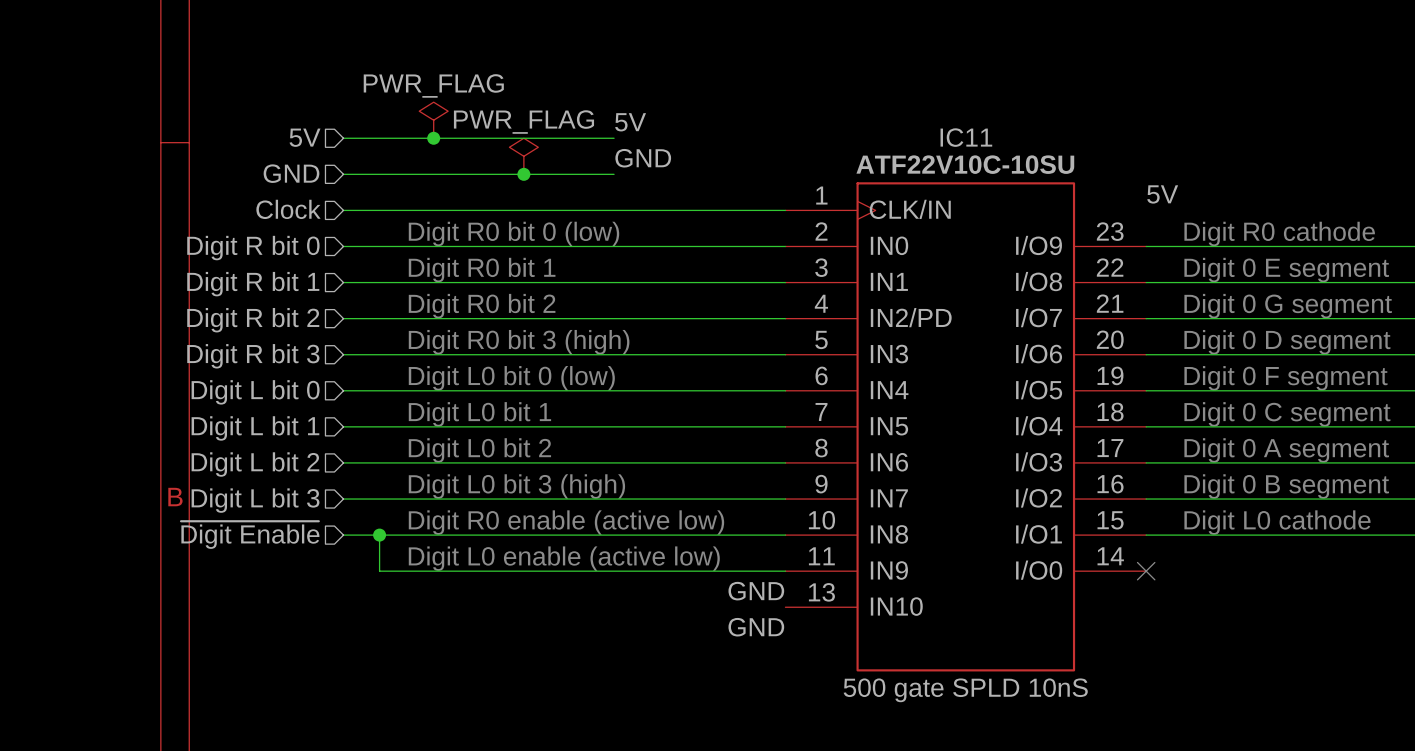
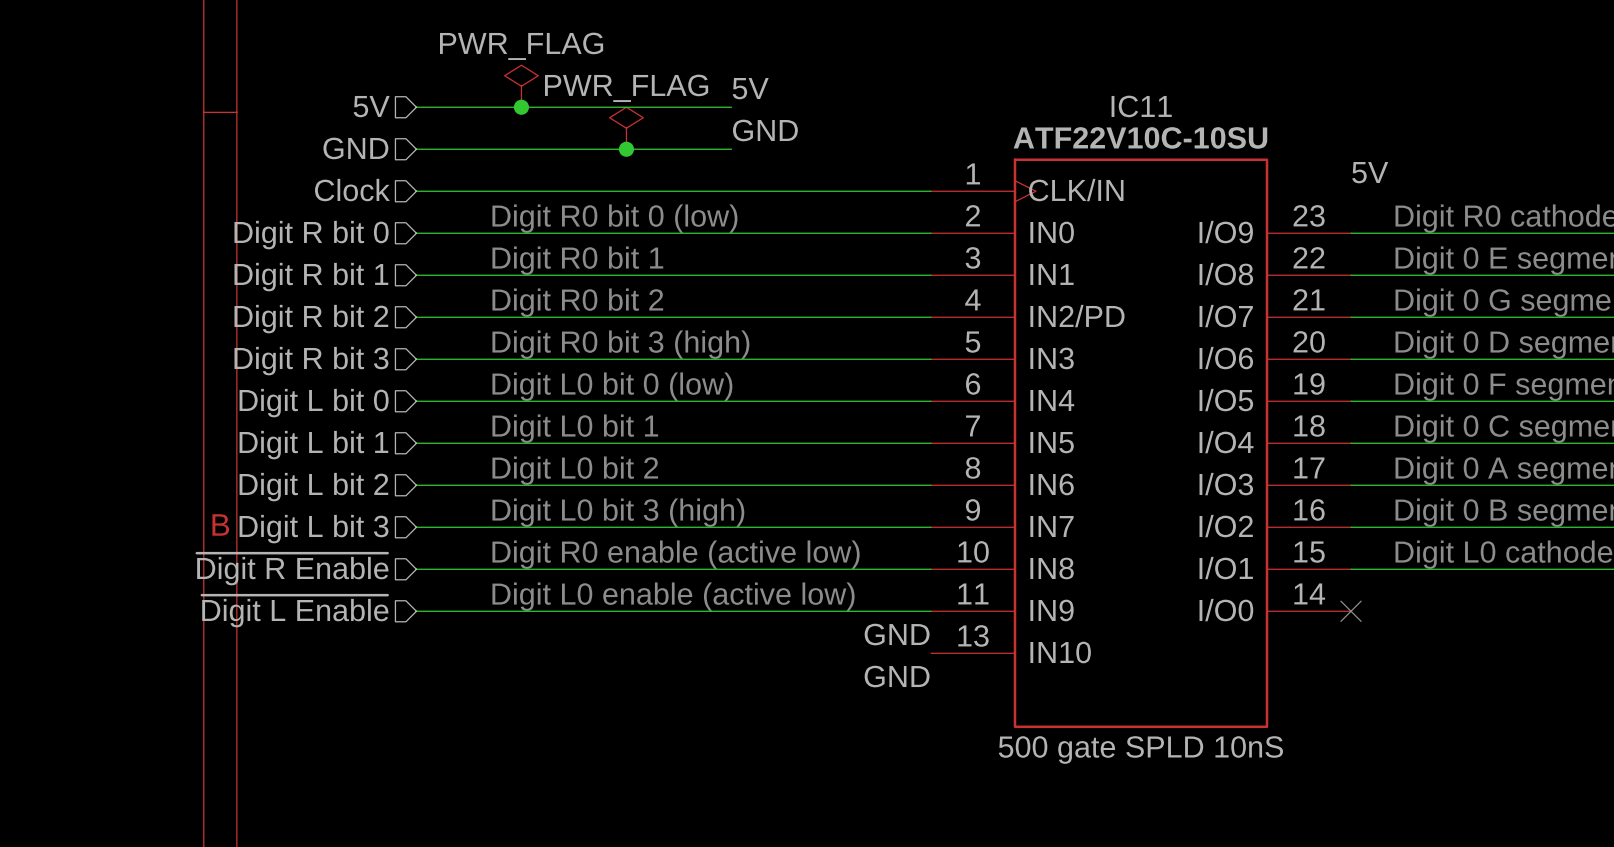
hierarchical label: ~{Digit Enable} (250, 535) -> ~{Digit R Enable} (292, 569)
wire: (379, 535) (379, 571) -> (416, 611) (458, 611)
junction: (379, 535) -> none
hierarchical label: none -> ~{Digit L Enable} (295, 611)

